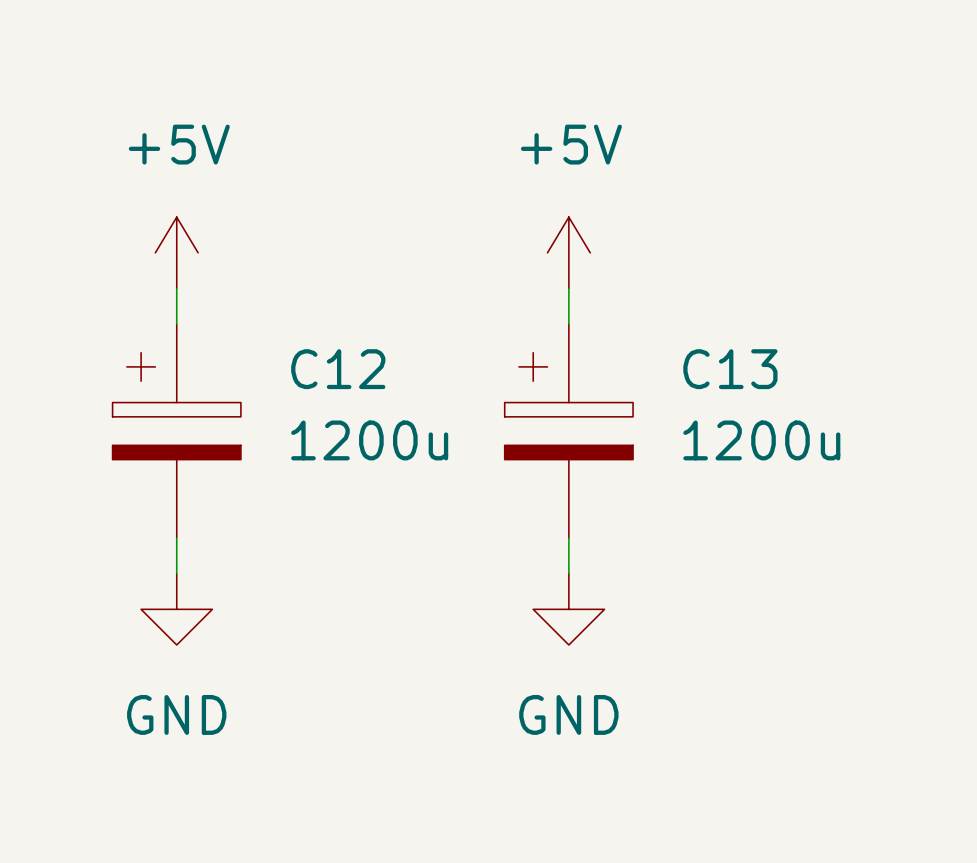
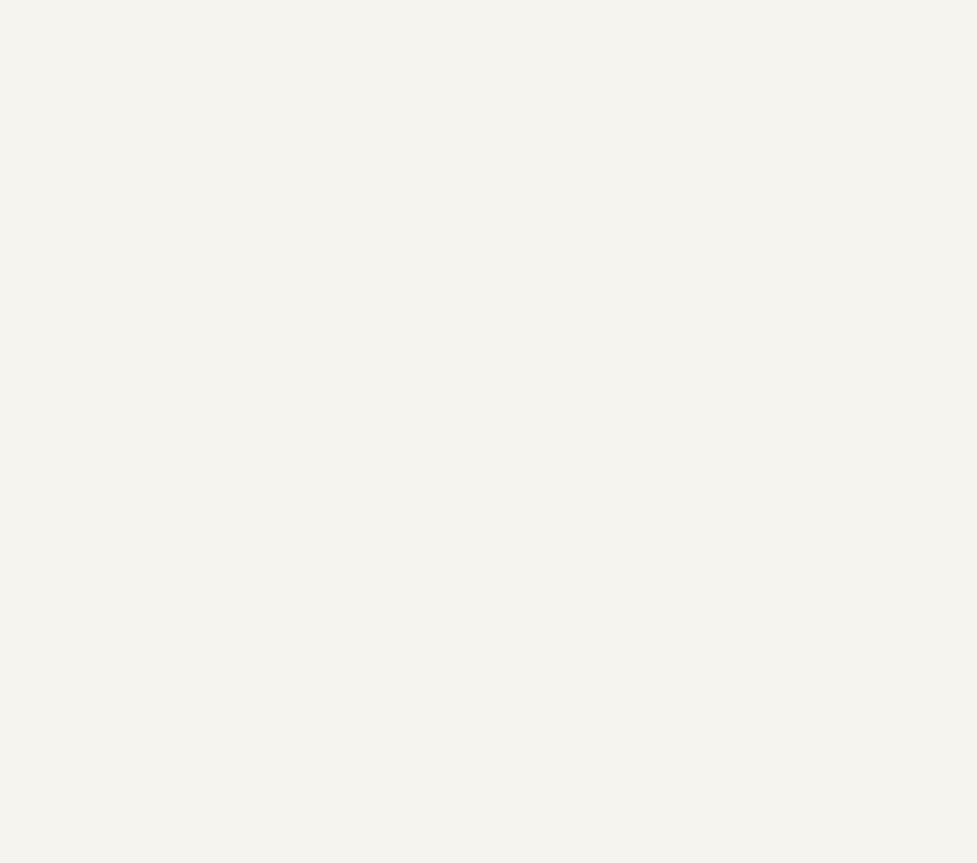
power symbol: +5V (176, 252) -> none
power symbol: +5V (568, 252) -> none
wire: (176, 288) (176, 324) -> none
wire: (568, 288) (568, 324) -> none
C12: 1200u (176, 431) -> none
C13: 1200u (568, 431) -> none
wire: (176, 538) (176, 573) -> none
wire: (568, 538) (568, 573) -> none
power symbol: GND (176, 609) -> none
power symbol: GND (568, 609) -> none

